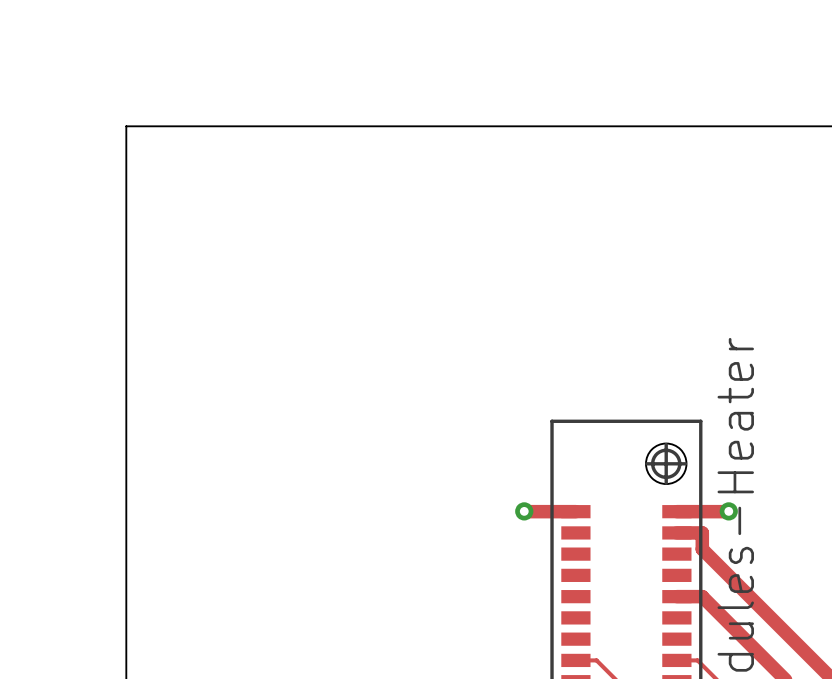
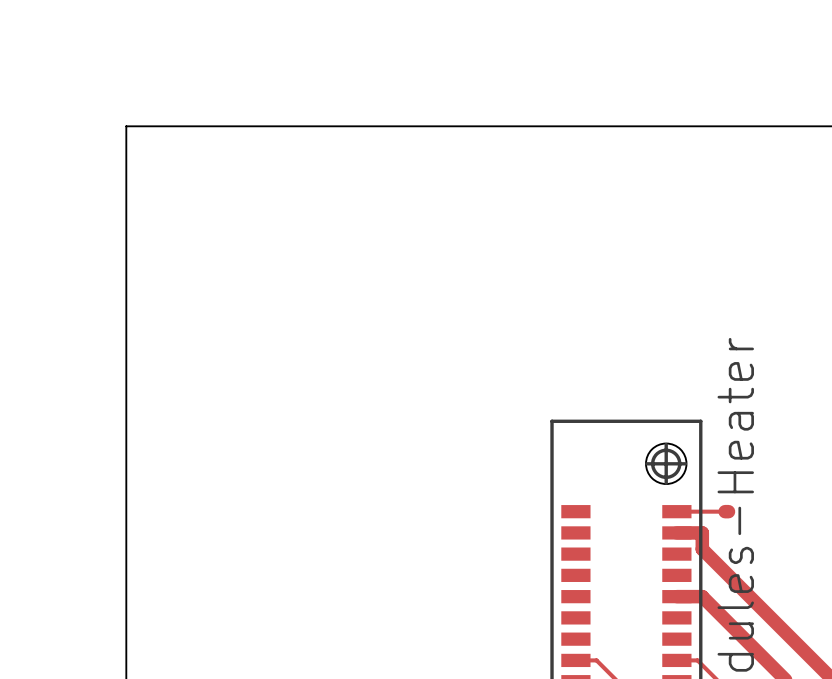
track: (524, 511) (575, 511) -> none
via: (524, 511) -> none
track width: thick (676, 511) (728, 511) -> thin (676, 511) (728, 511)
via: (728, 511) -> none

